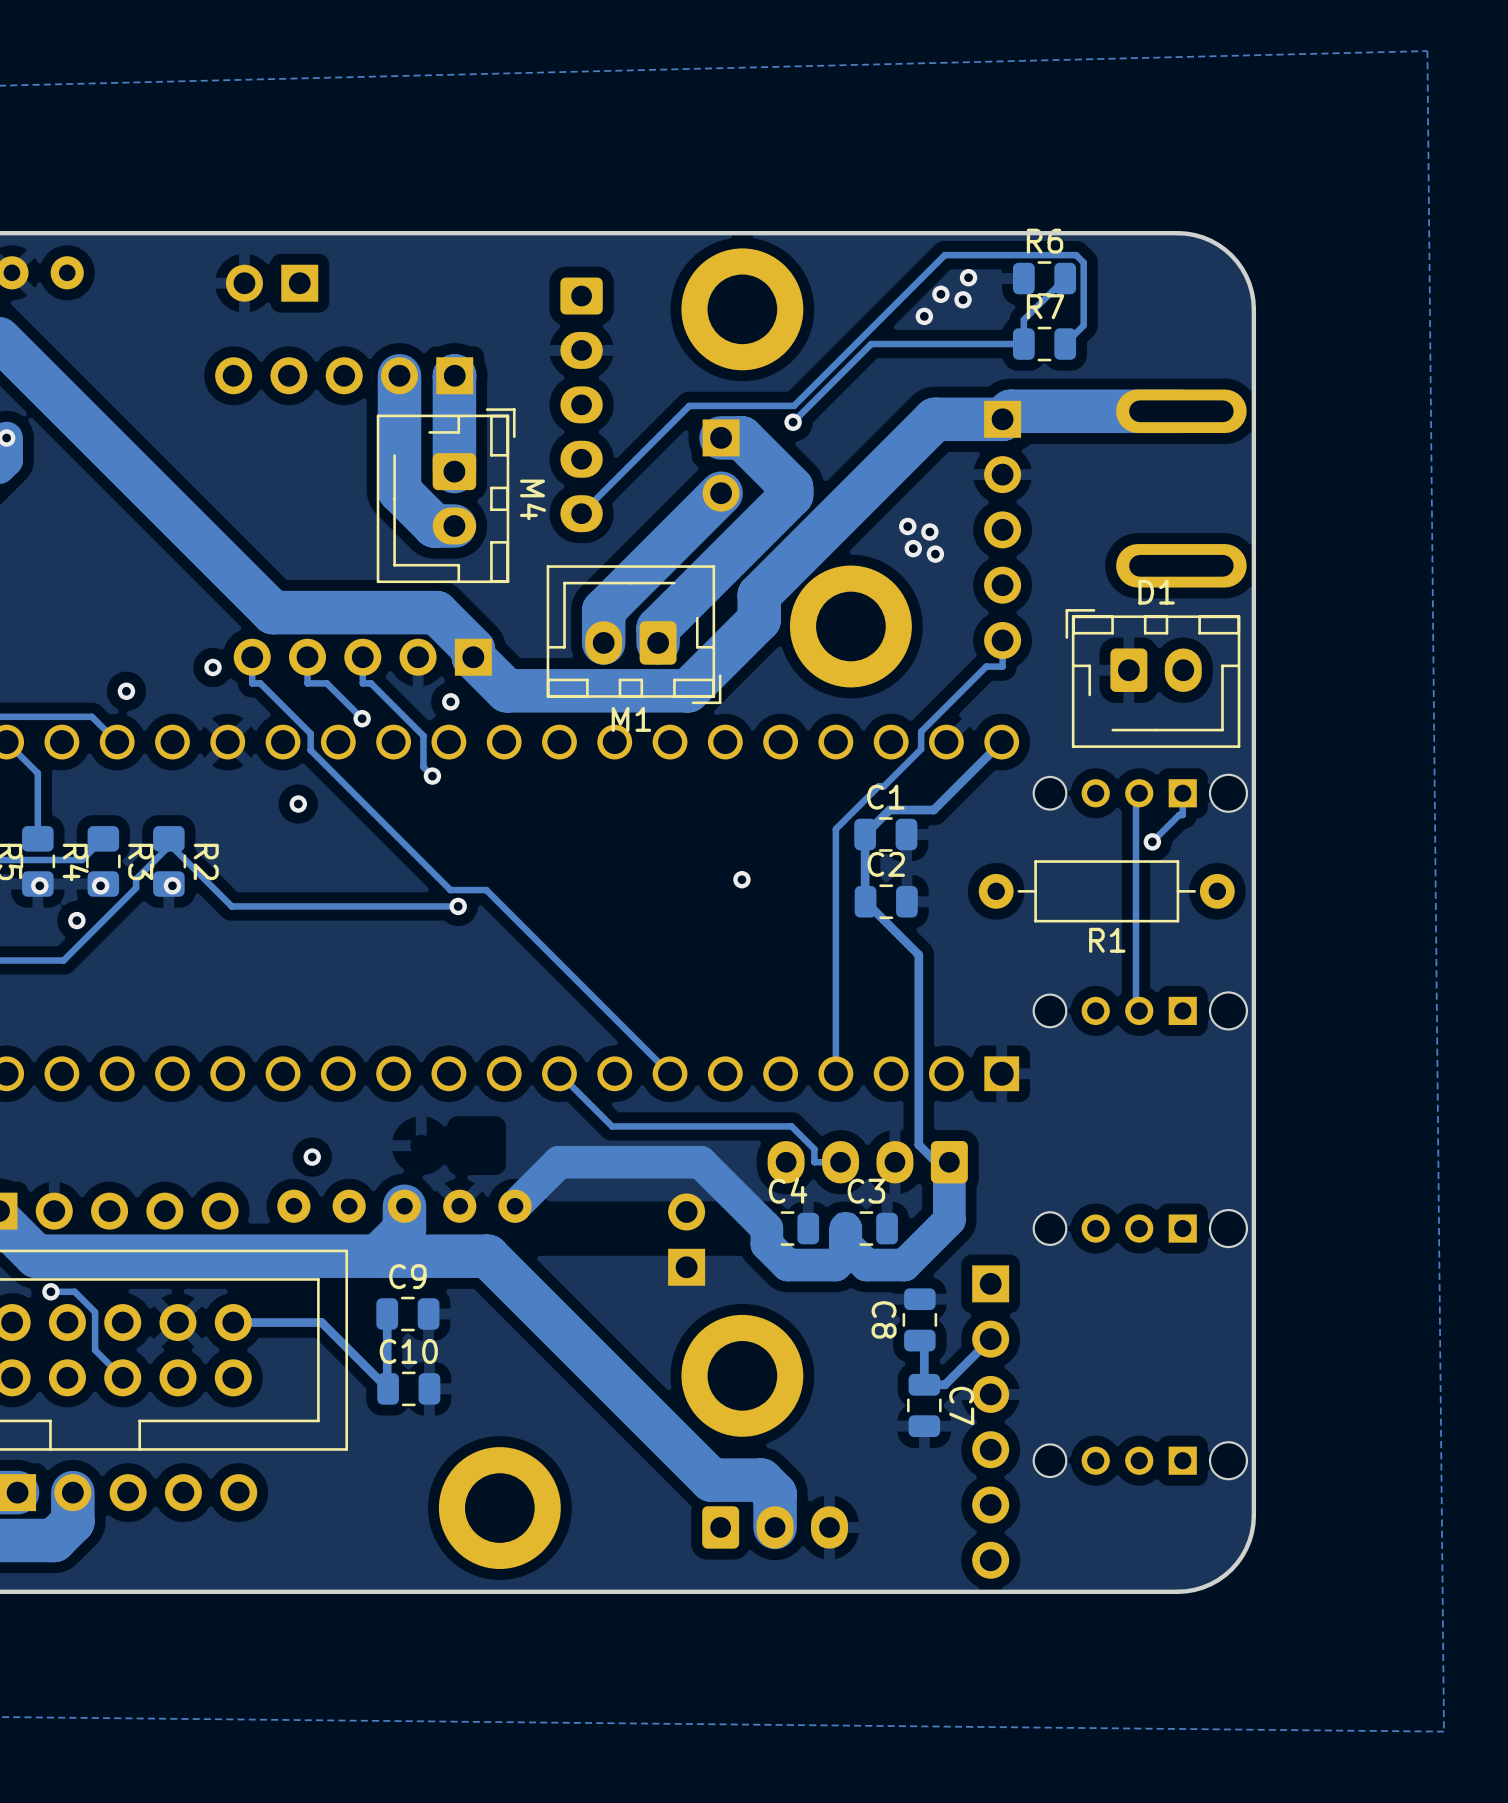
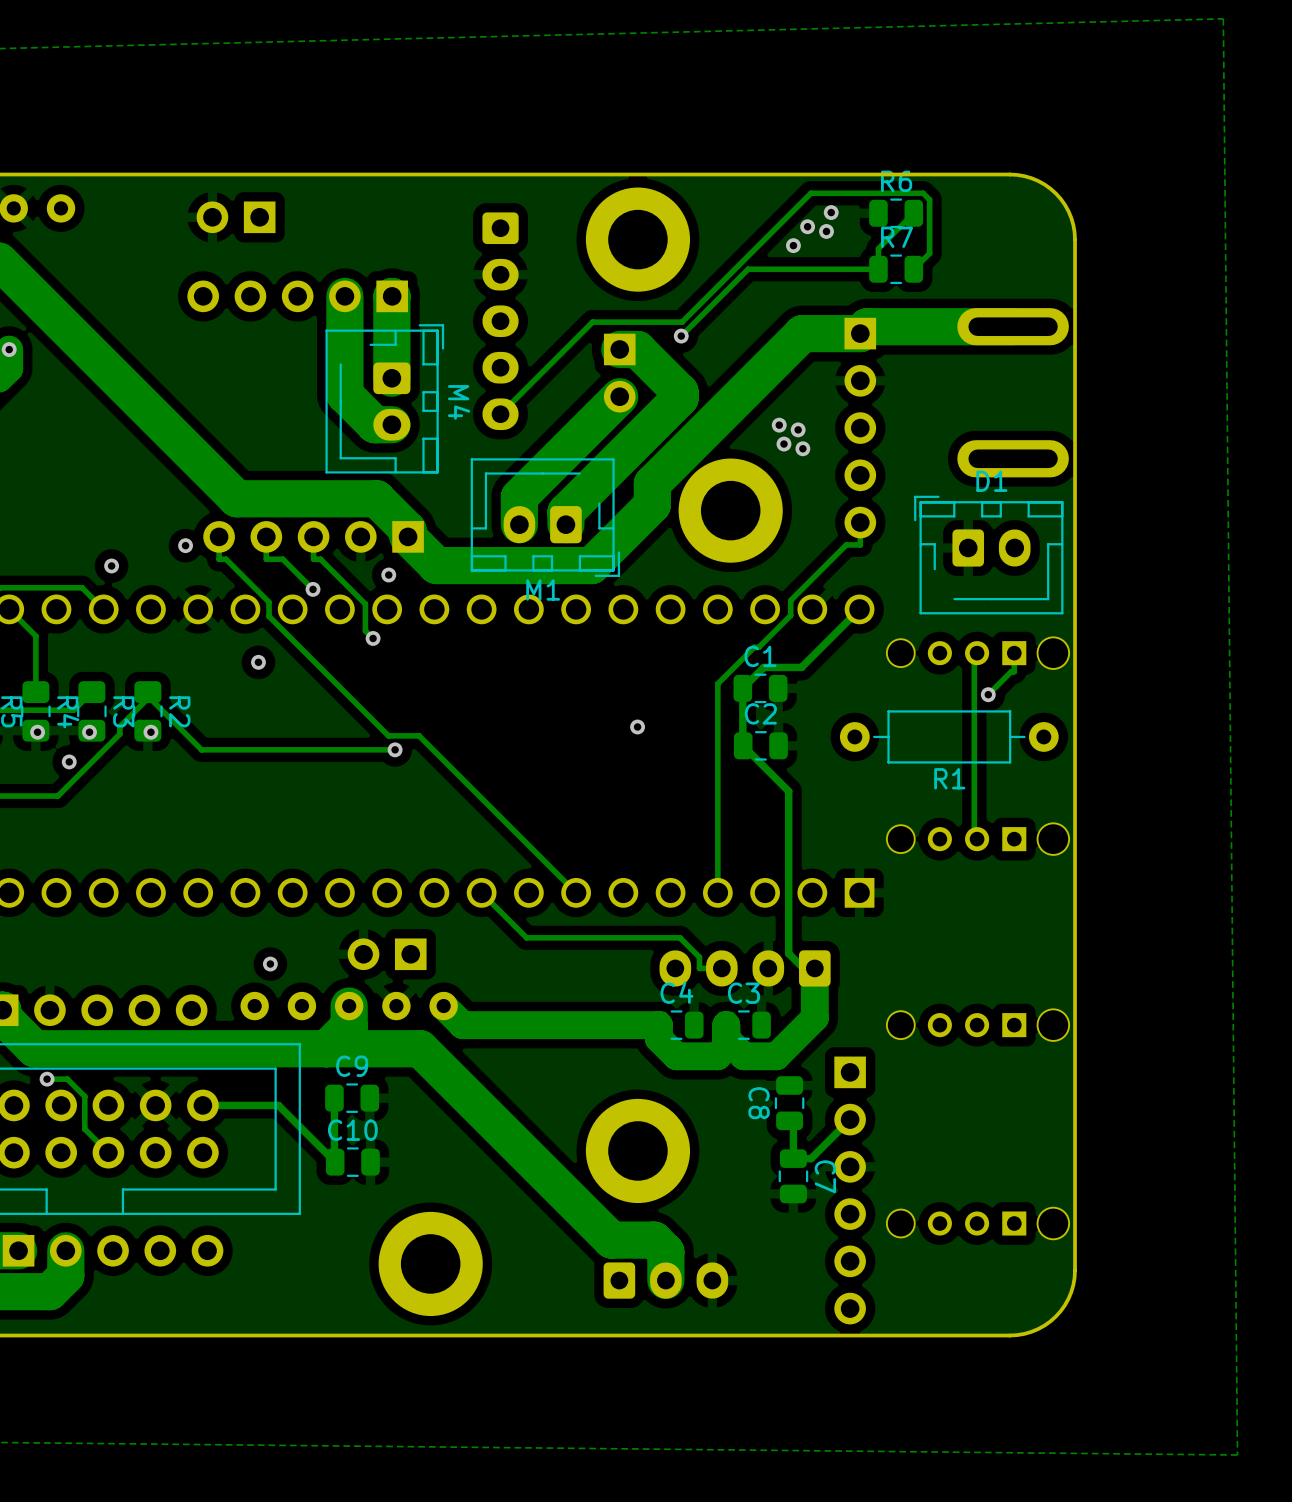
track: (515, 1206) (559, 1162) (700, 1162) (766, 1228) -> (443, 1006) (462, 1025) (658, 1025)
part rotation: 0° (686, 1239) -> 90° counterclockwise (387, 954)
part position: (686, 1239) -> (387, 954)

